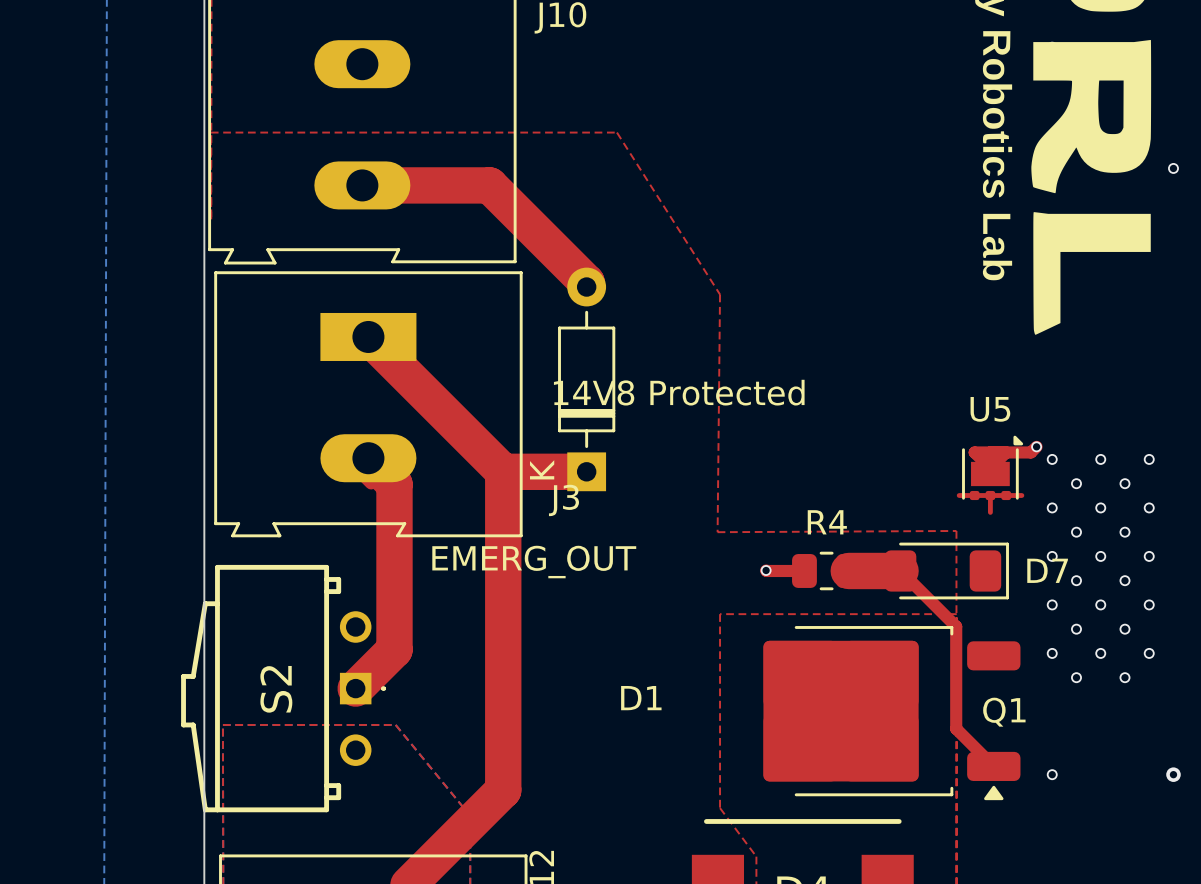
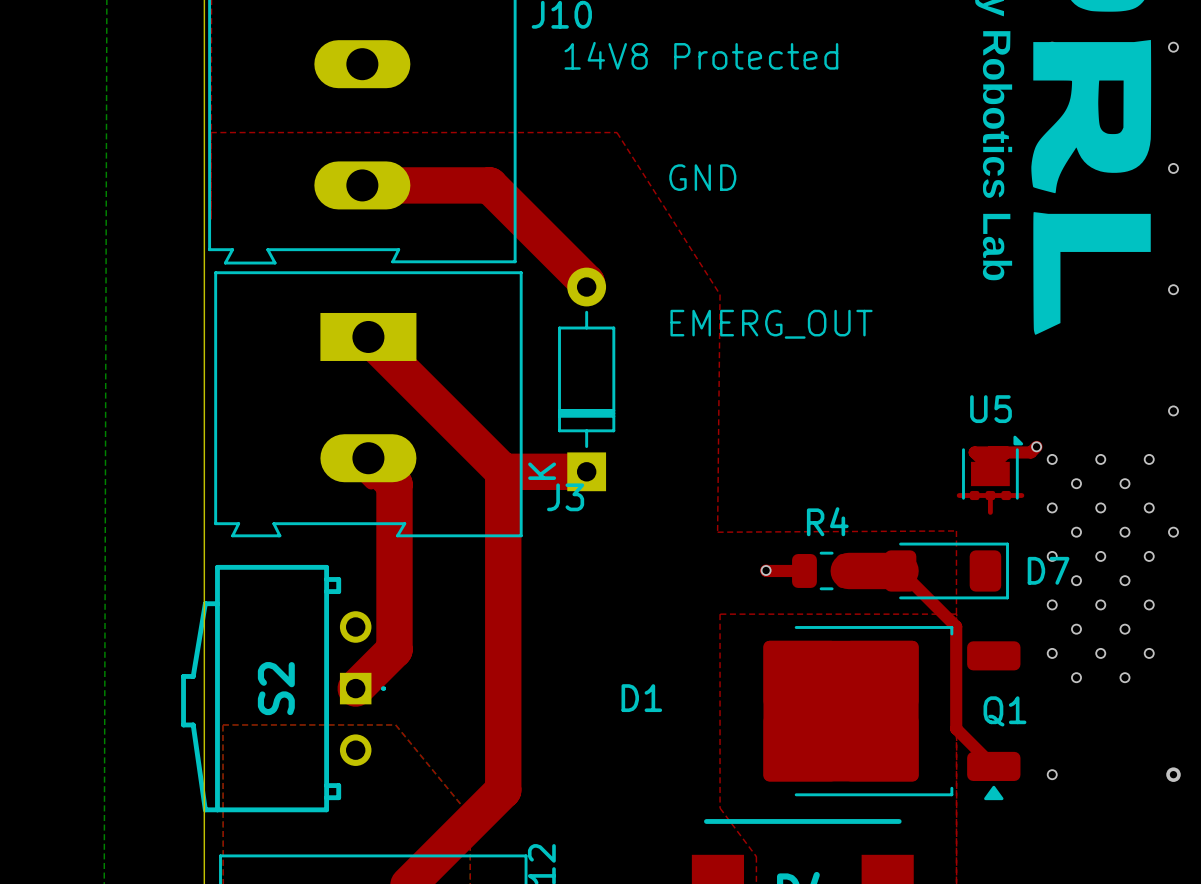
via: none -> (1173, 47)
text: none -> GND (702, 177)
via: none -> (1173, 289)
text position: 14V8 Protected (679, 392) -> 14V8 Protected (701, 55)
via: none -> (1173, 410)
via: none -> (1173, 532)
text position: EMERG_OUT (534, 562) -> EMERG_OUT (771, 324)

